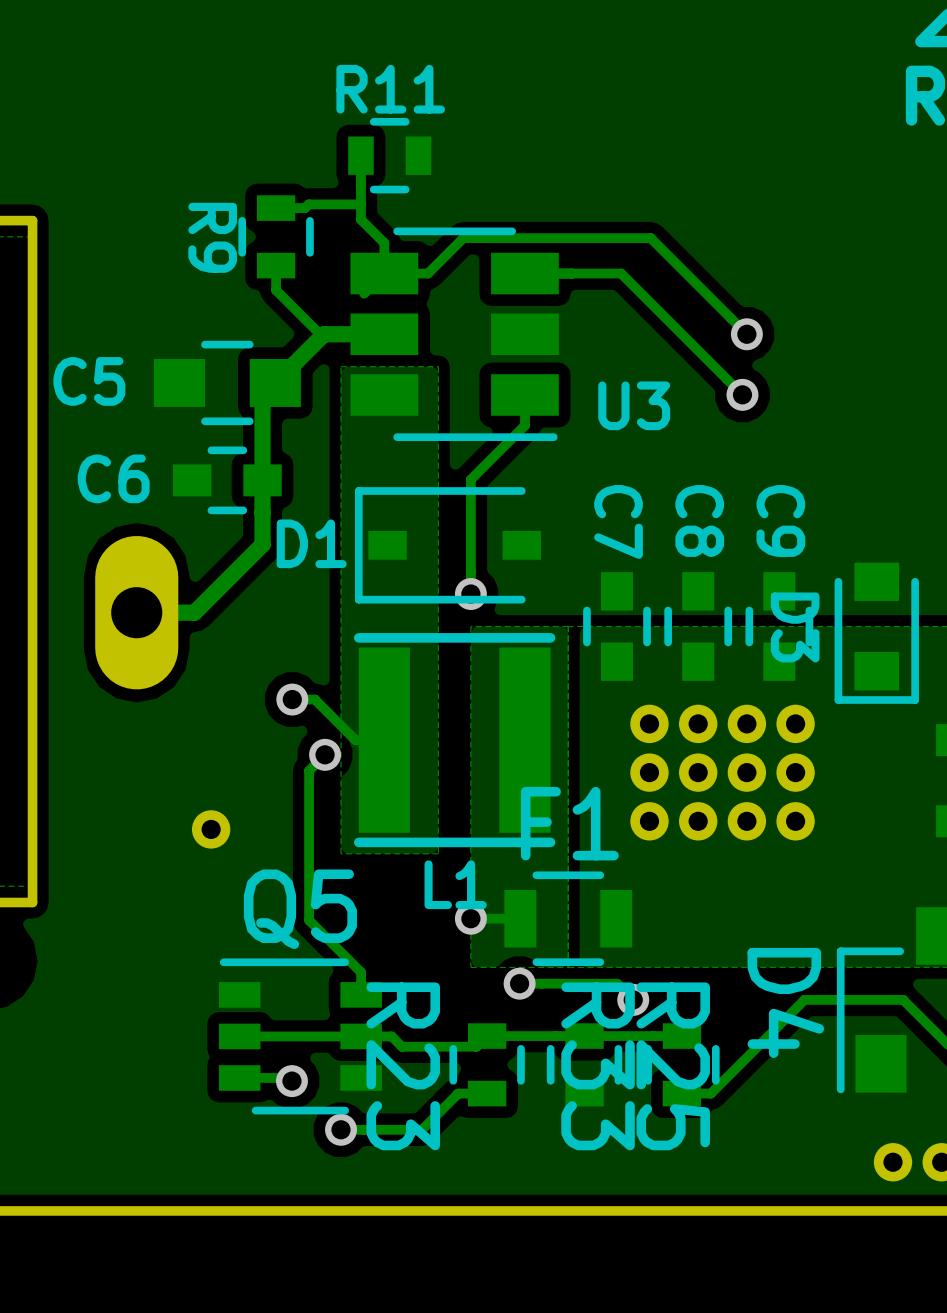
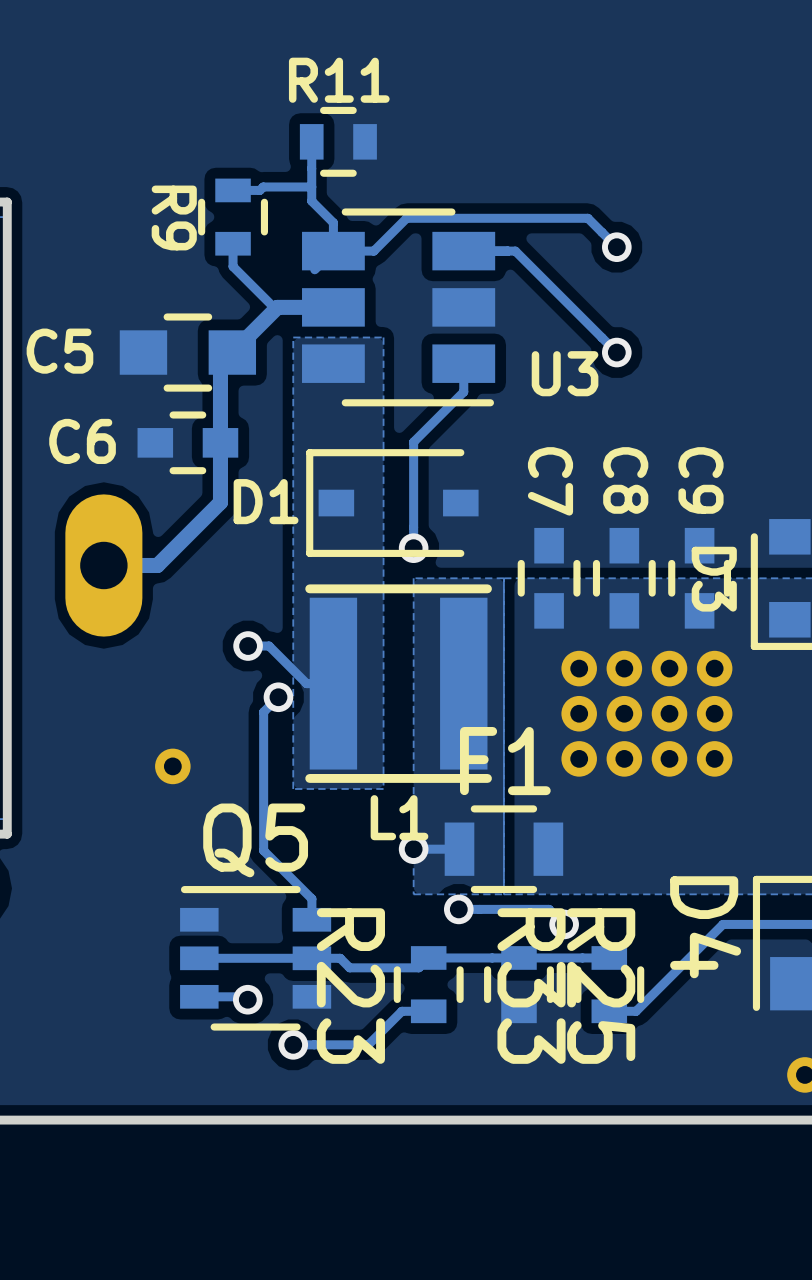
track: (650, 238) (746, 334) -> (580, 218) (587, 218) (616, 247)
via: none -> (616, 247)
track: (580, 273) (621, 273) (742, 394) -> (515, 251) (616, 352)
via: (746, 334) -> none
via: none -> (616, 352)
via: (742, 394) -> none

